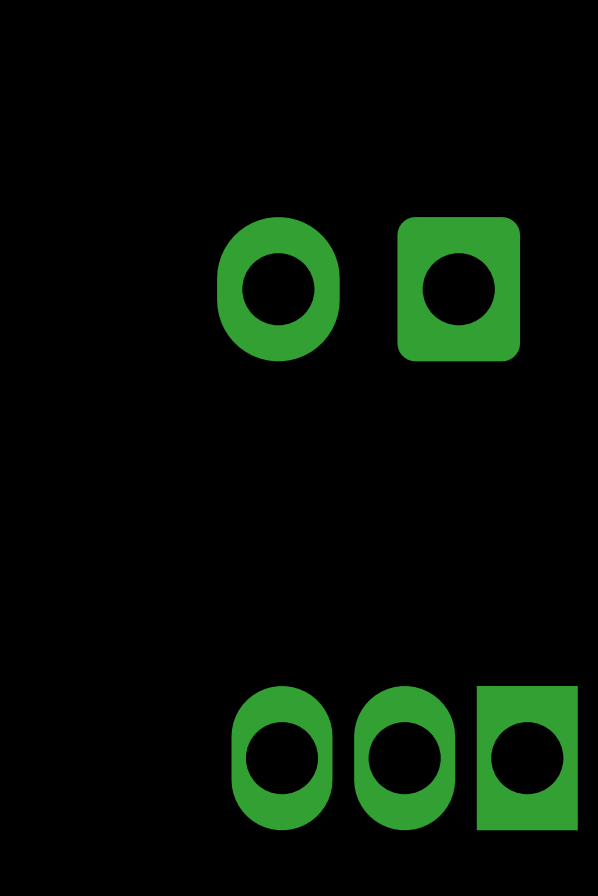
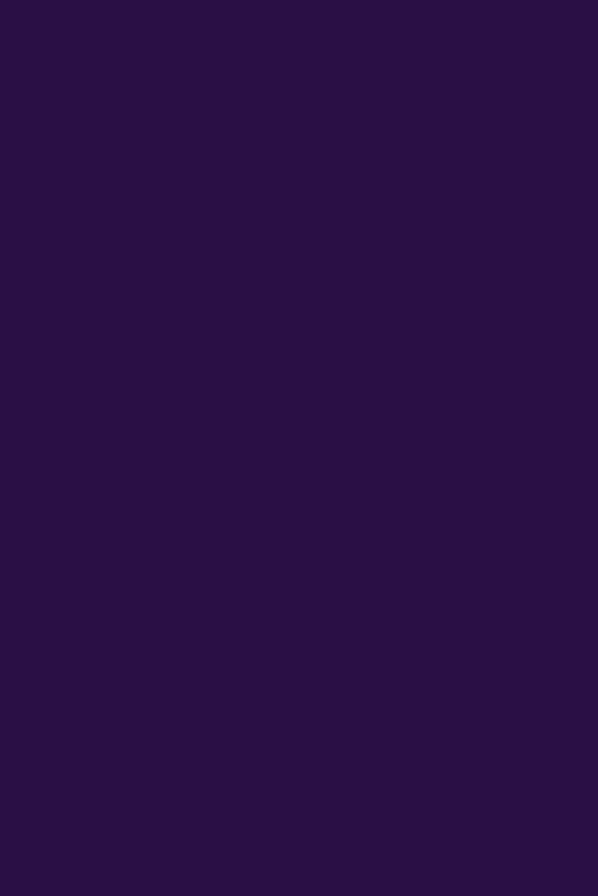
part: (368, 289) -> none
part: (404, 758) -> none

